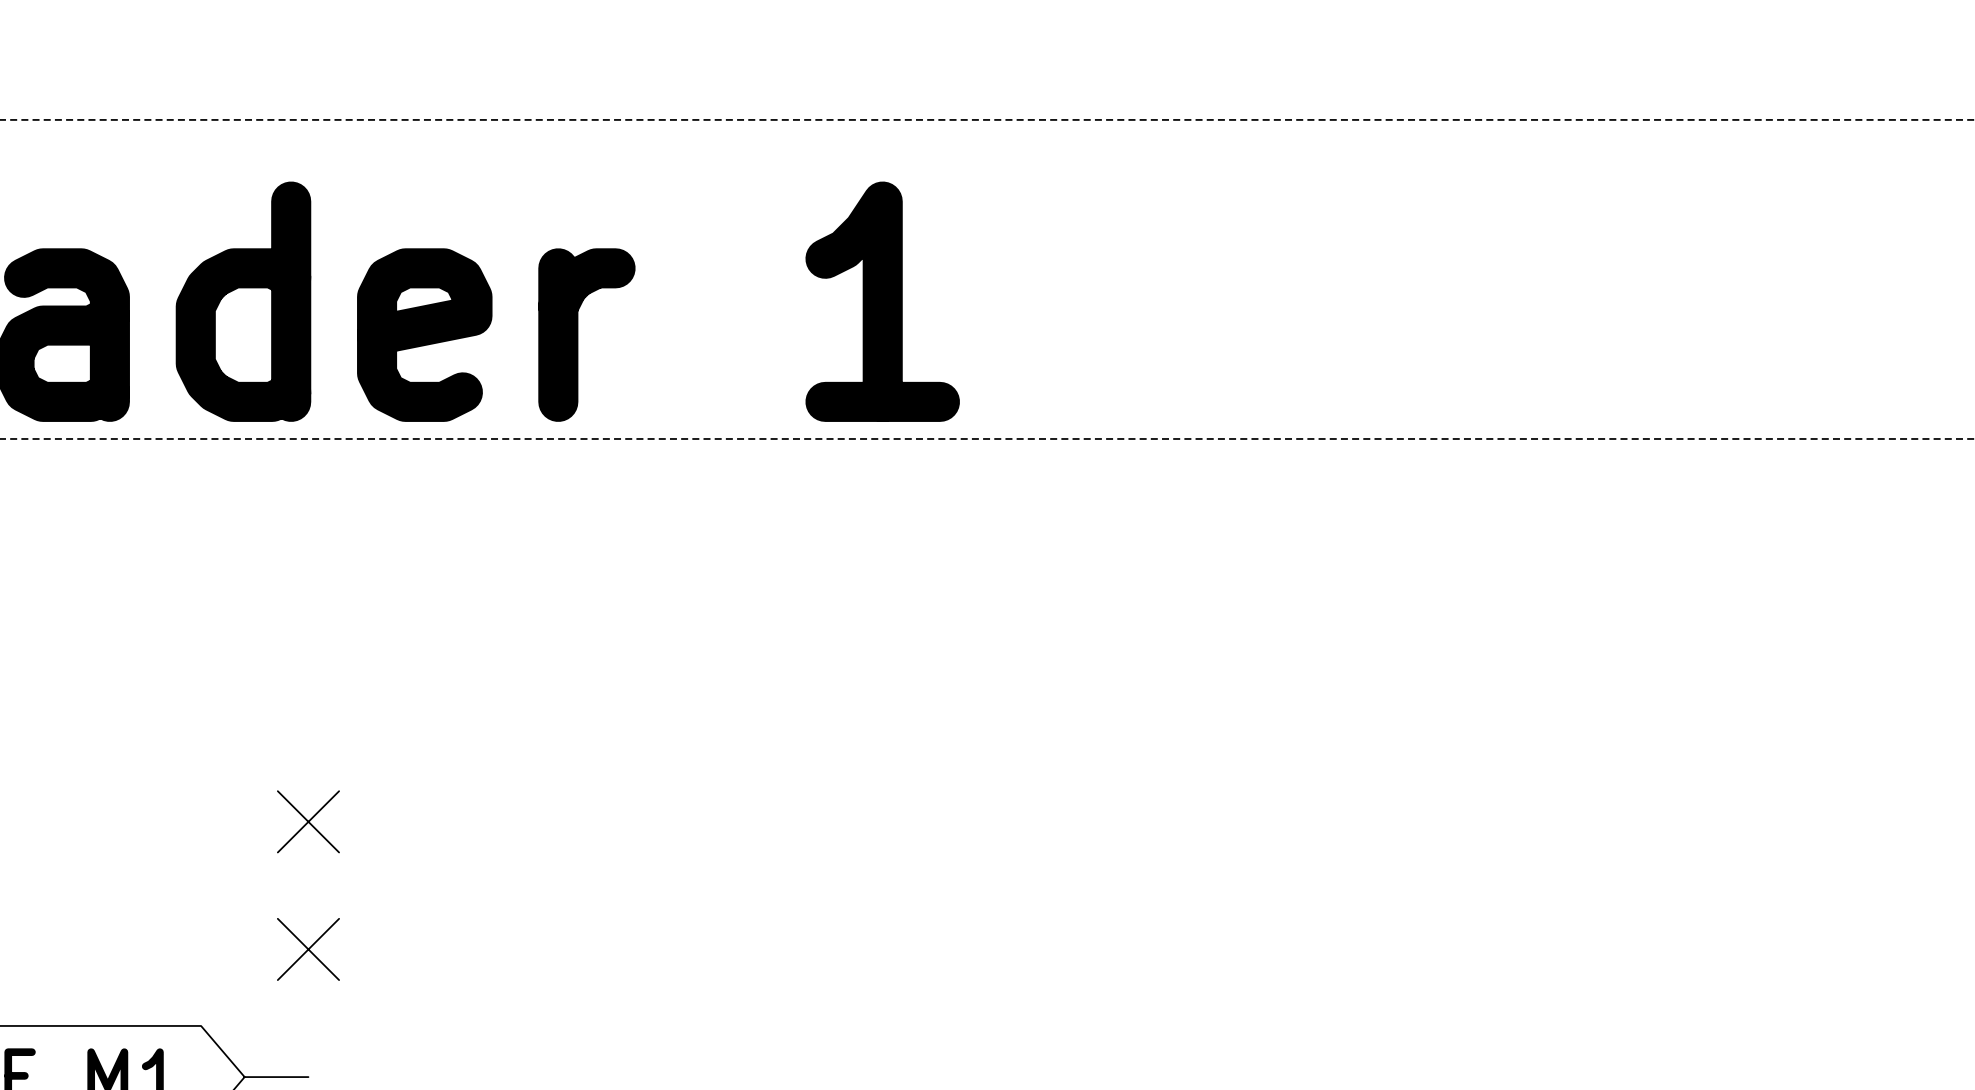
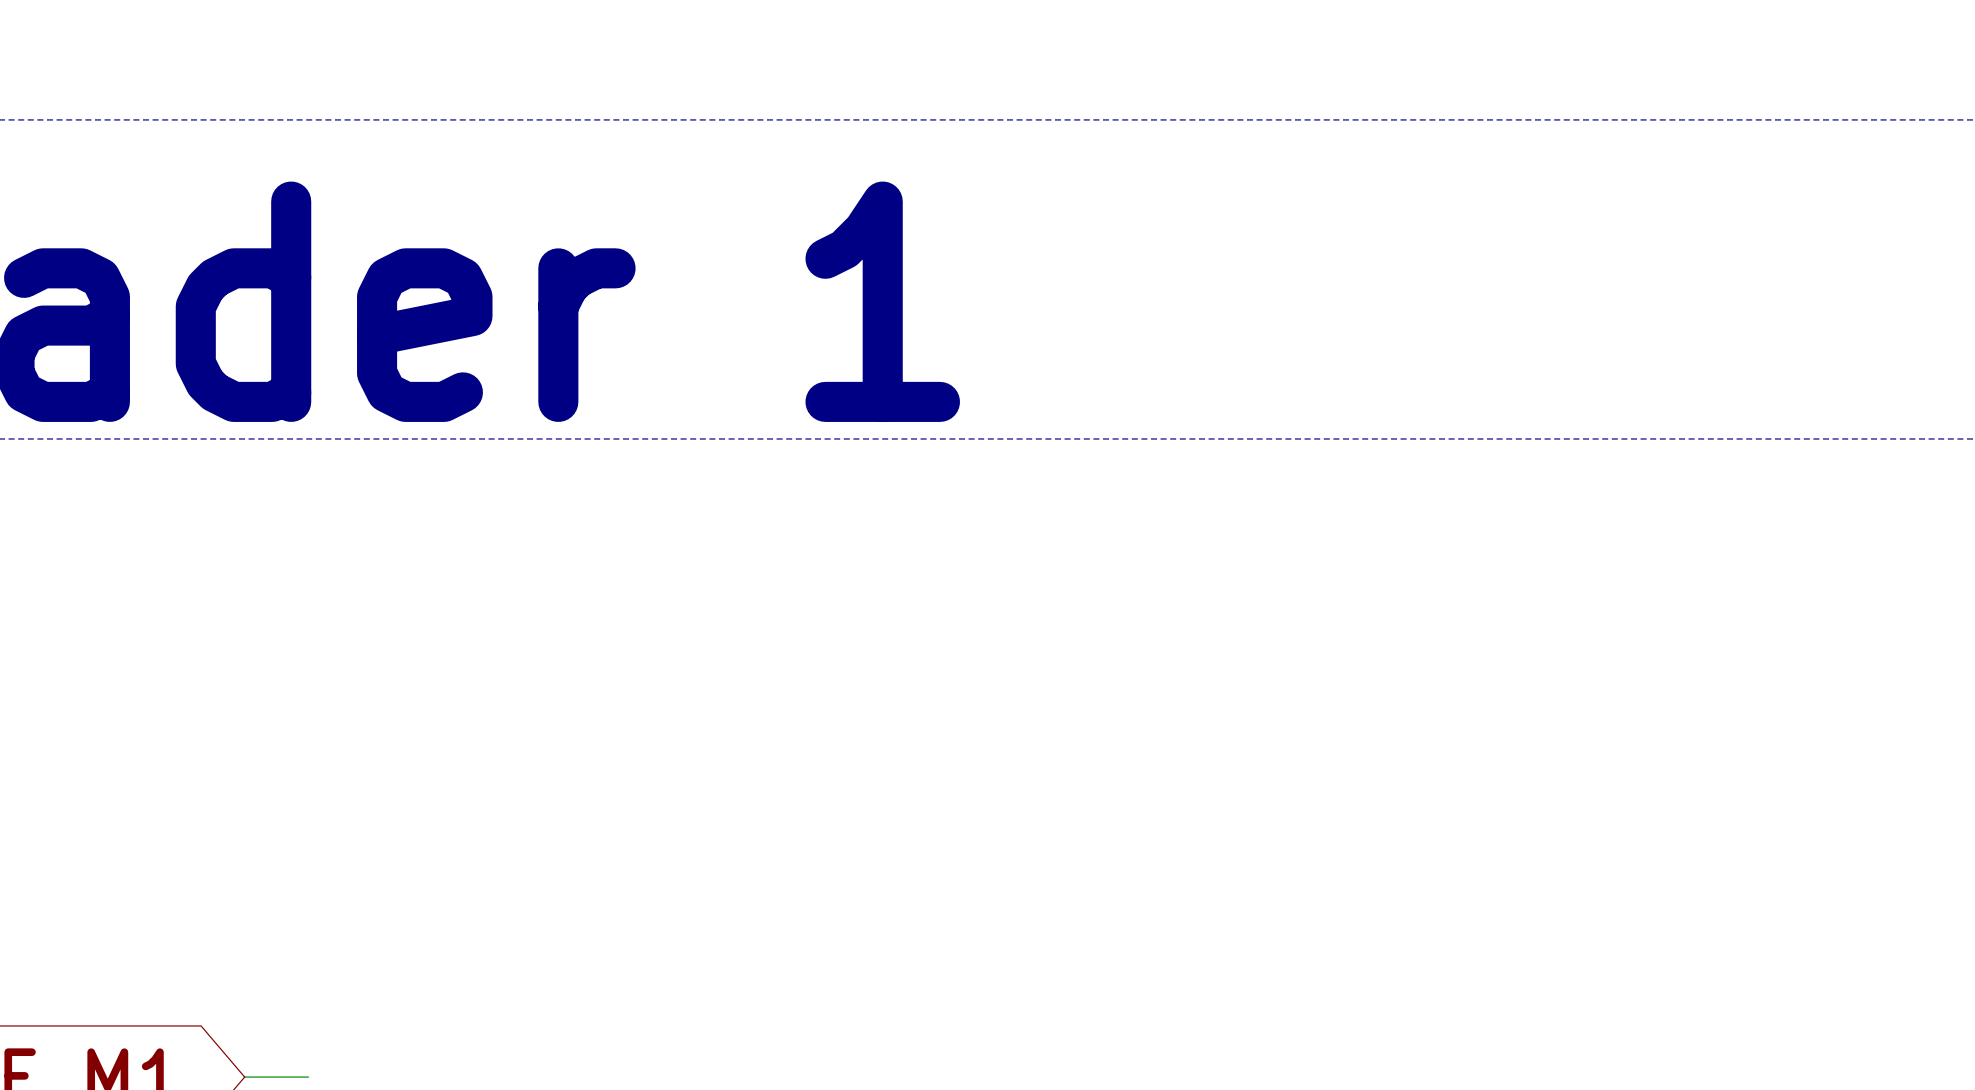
no-connect mark: (308, 821) -> none
no-connect mark: (308, 949) -> none

